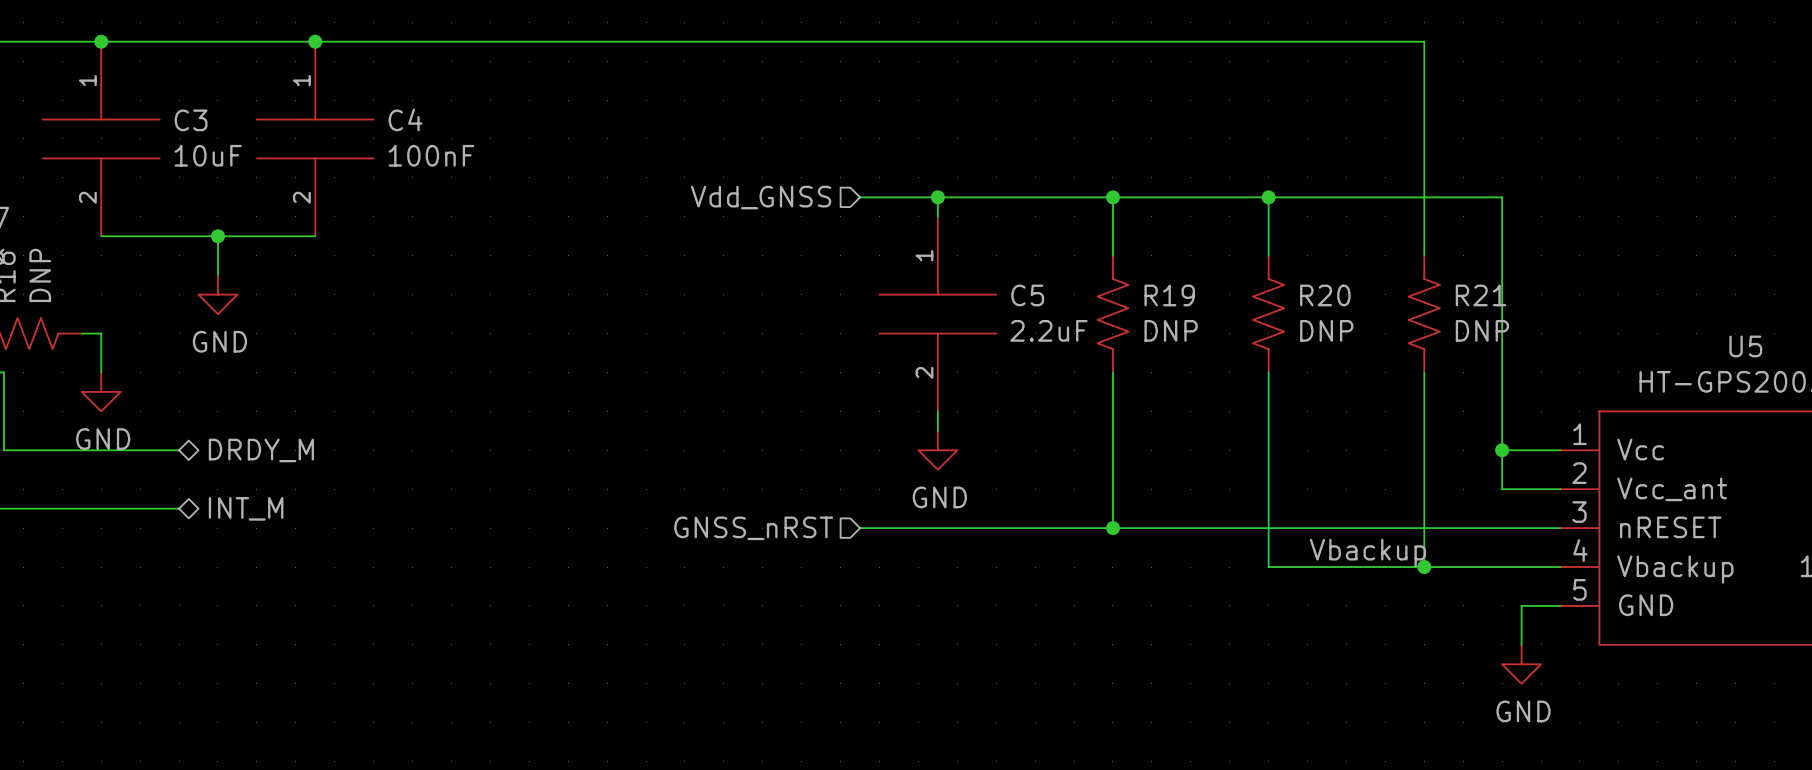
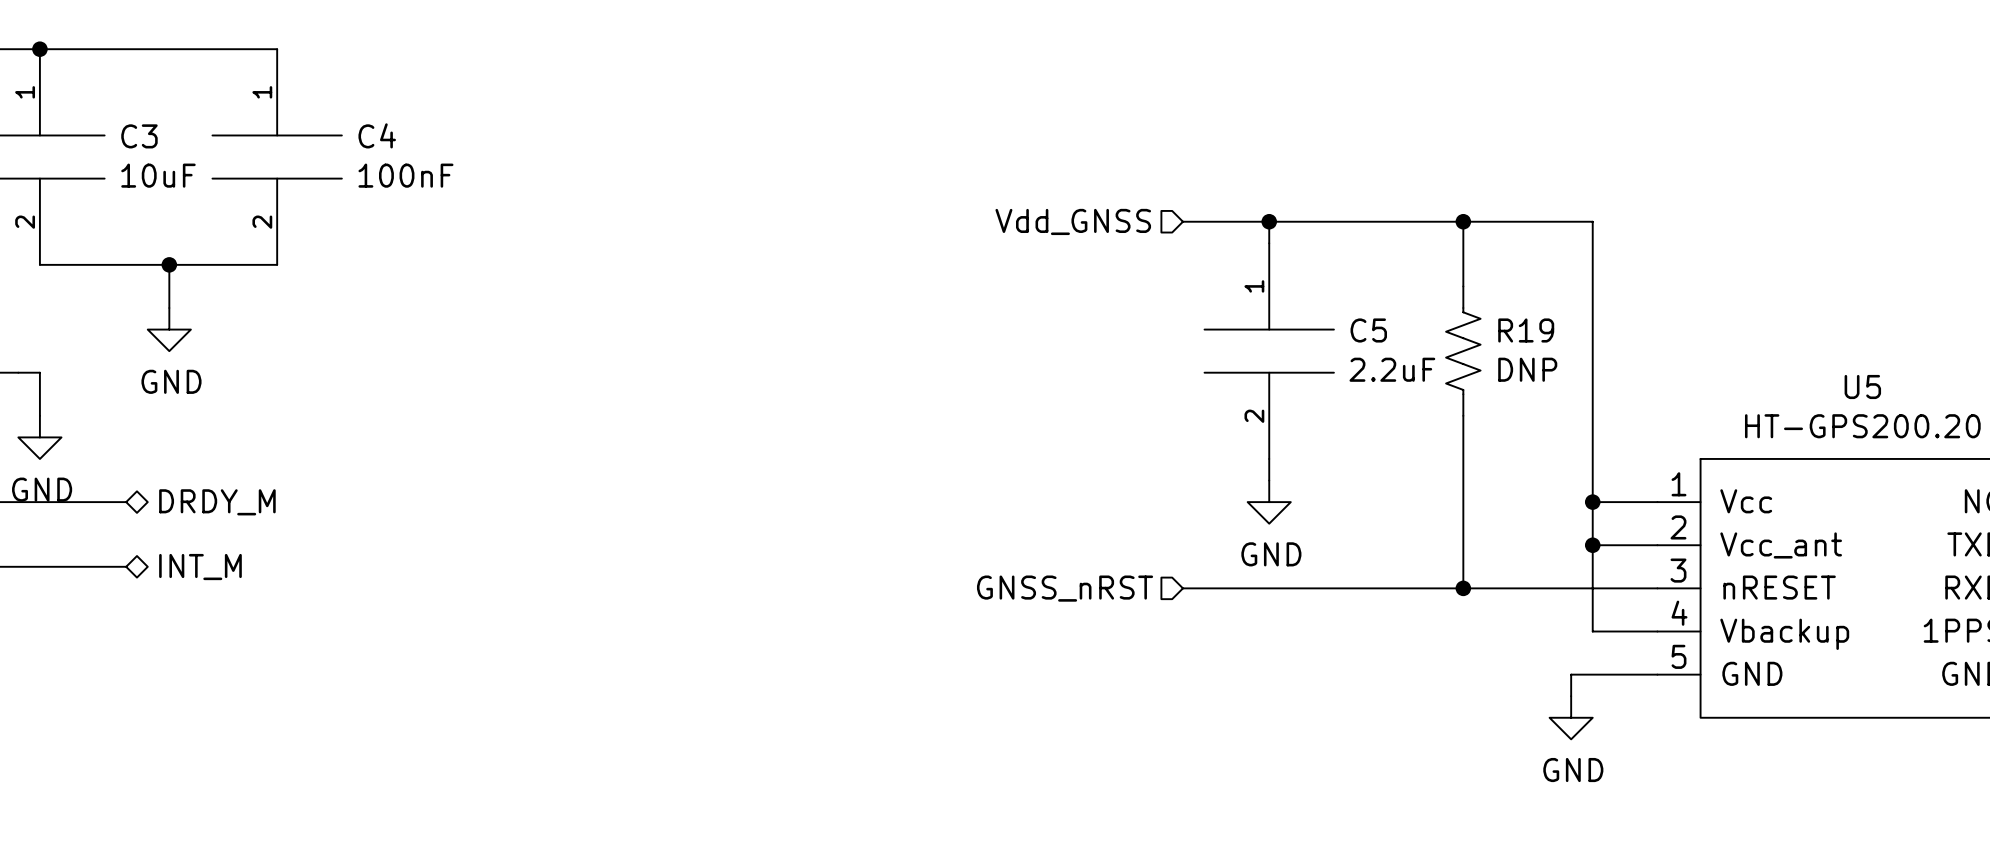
wire: (315, 41) (1424, 41) (1424, 255) -> none
junction: (315, 41) -> none
hierarchical label position: Vdd_GNSS (761, 197) -> Vdd_GNSS (1073, 221)
wire: (860, 197) (1132, 197) -> none
wire: (937, 197) (937, 216) -> (1269, 221) (1269, 243)
junction: (937, 197) -> none
wire: (1112, 197) (1112, 255) -> (1463, 221) (1463, 286)
junction: (1112, 197) -> none
junction: none -> (1269, 221)
wire: (1268, 197) (1268, 255) -> none
junction: (1268, 197) -> none
junction: none -> (1463, 221)
C5 position: (937, 314) -> (1269, 351)
R19 position: (1112, 314) -> (1463, 351)
R20: DNP (1268, 314) -> none
R21: DNP (1424, 314) -> none
wire: (1112, 372) (1112, 528) -> (1463, 415) (1463, 588)
wire: (1268, 372) (1268, 567) (1502, 567) -> (1592, 545) (1592, 631)
wire: (1424, 372) (1424, 567) -> none
wire: (937, 411) (937, 430) -> (1269, 458) (1269, 480)
power symbol: GND (937, 450) -> none
power symbol: none -> GND (1269, 502)
junction: none -> (1592, 545)
hierarchical label position: GNSS_nRST (753, 528) -> GNSS_nRST (1065, 588)
wire: (860, 528) (1132, 528) -> none
junction: (1112, 528) -> none
junction: none -> (1463, 588)
label: Vbackup (1367, 552) -> none
junction: (1424, 567) -> none
wire: (1521, 605) (1521, 644) -> (1614, 674) (1571, 674) (1571, 696)
power symbol position: GND (1521, 664) -> GND (1571, 717)

